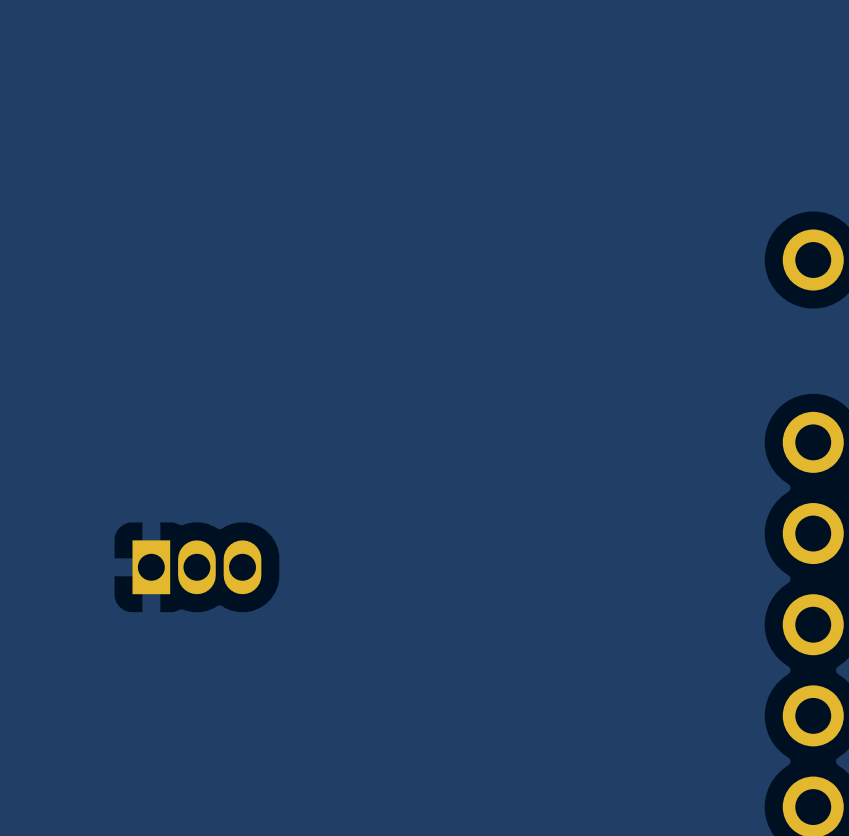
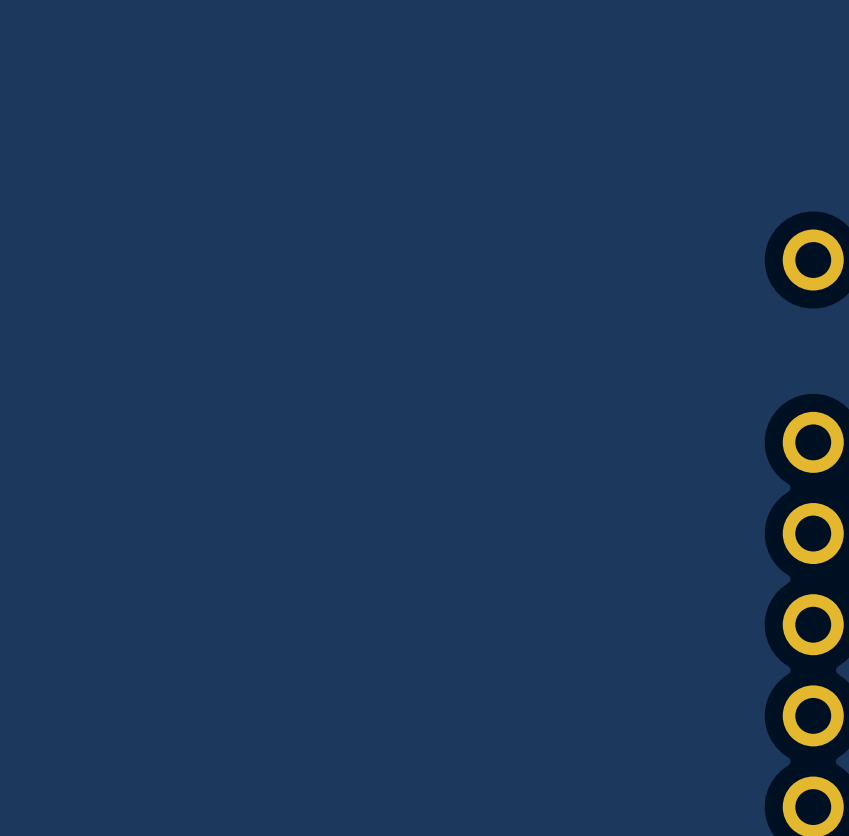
part: (196, 567) -> none

